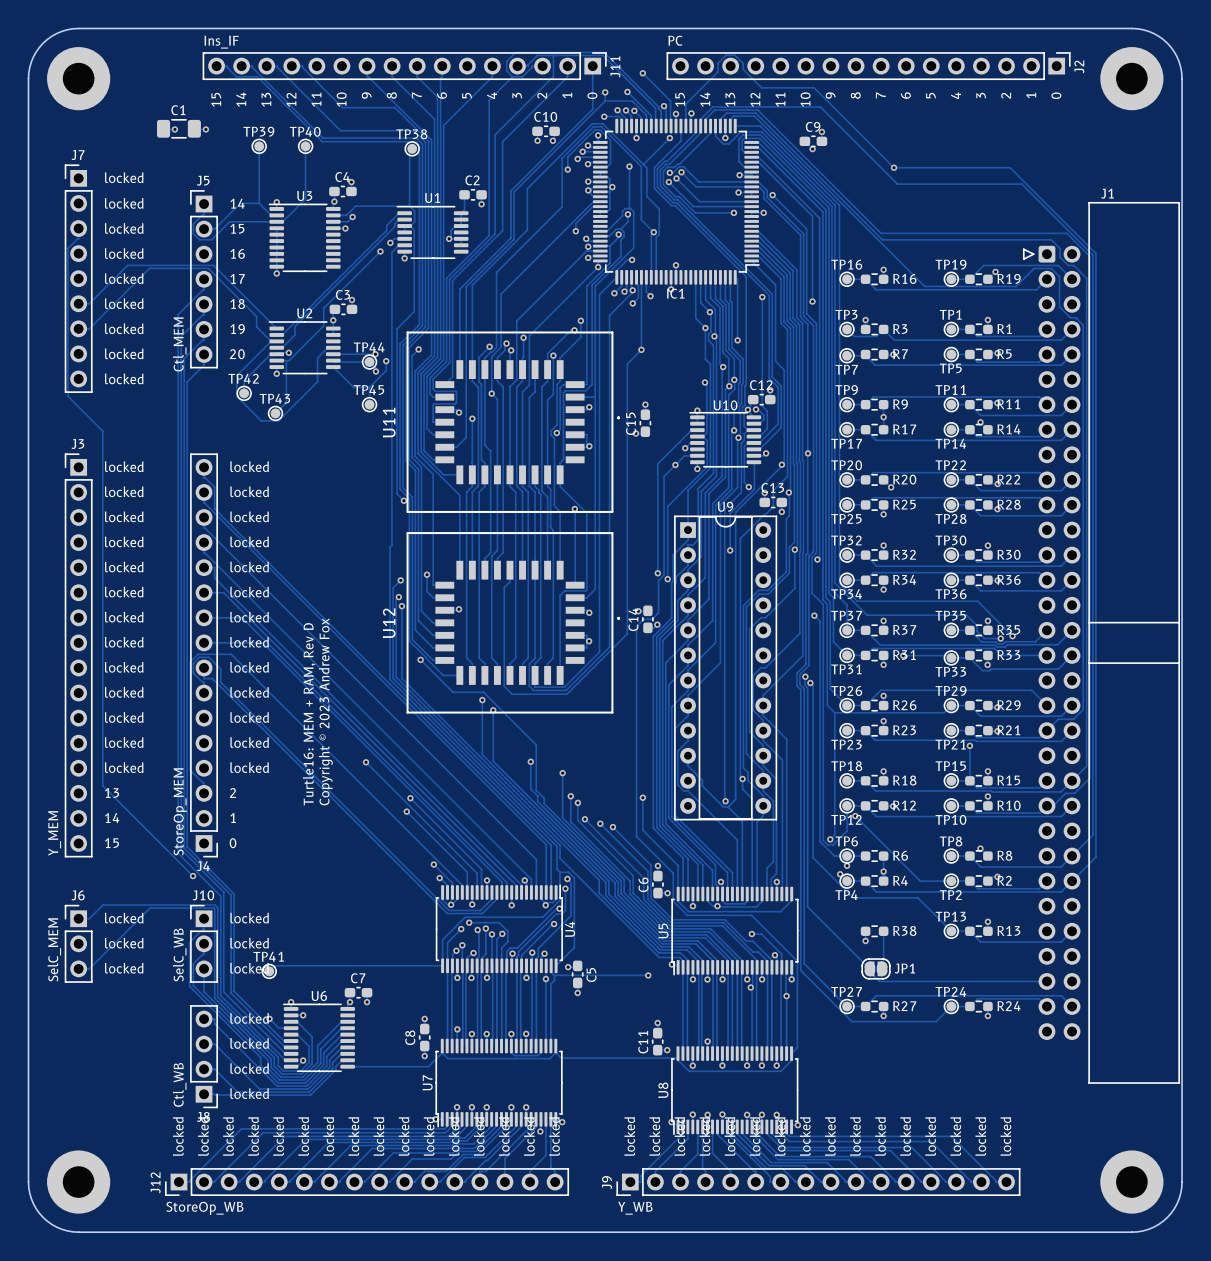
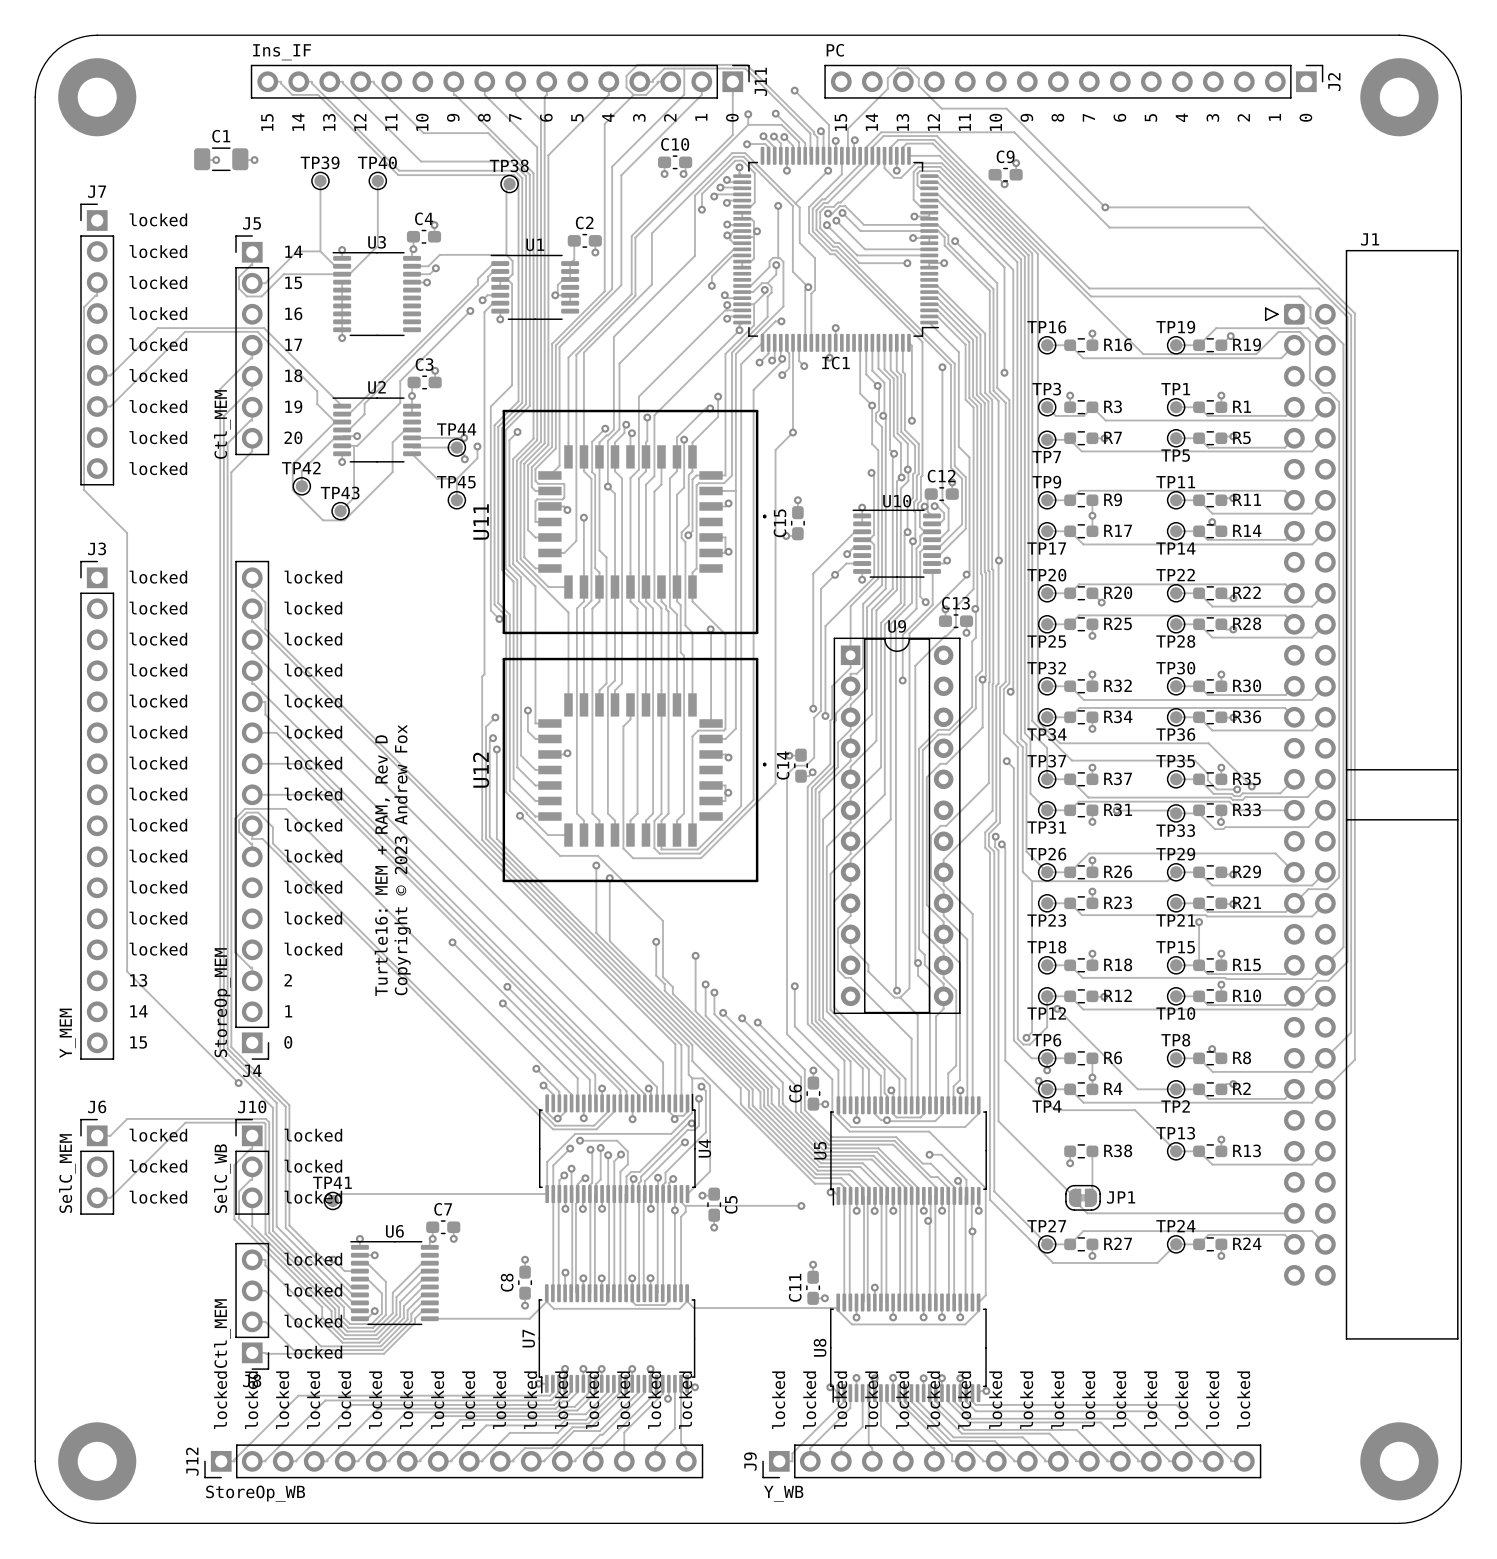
J8 value: Ctl_WB (179, 1084) -> Ctl_MEM (222, 1333)

